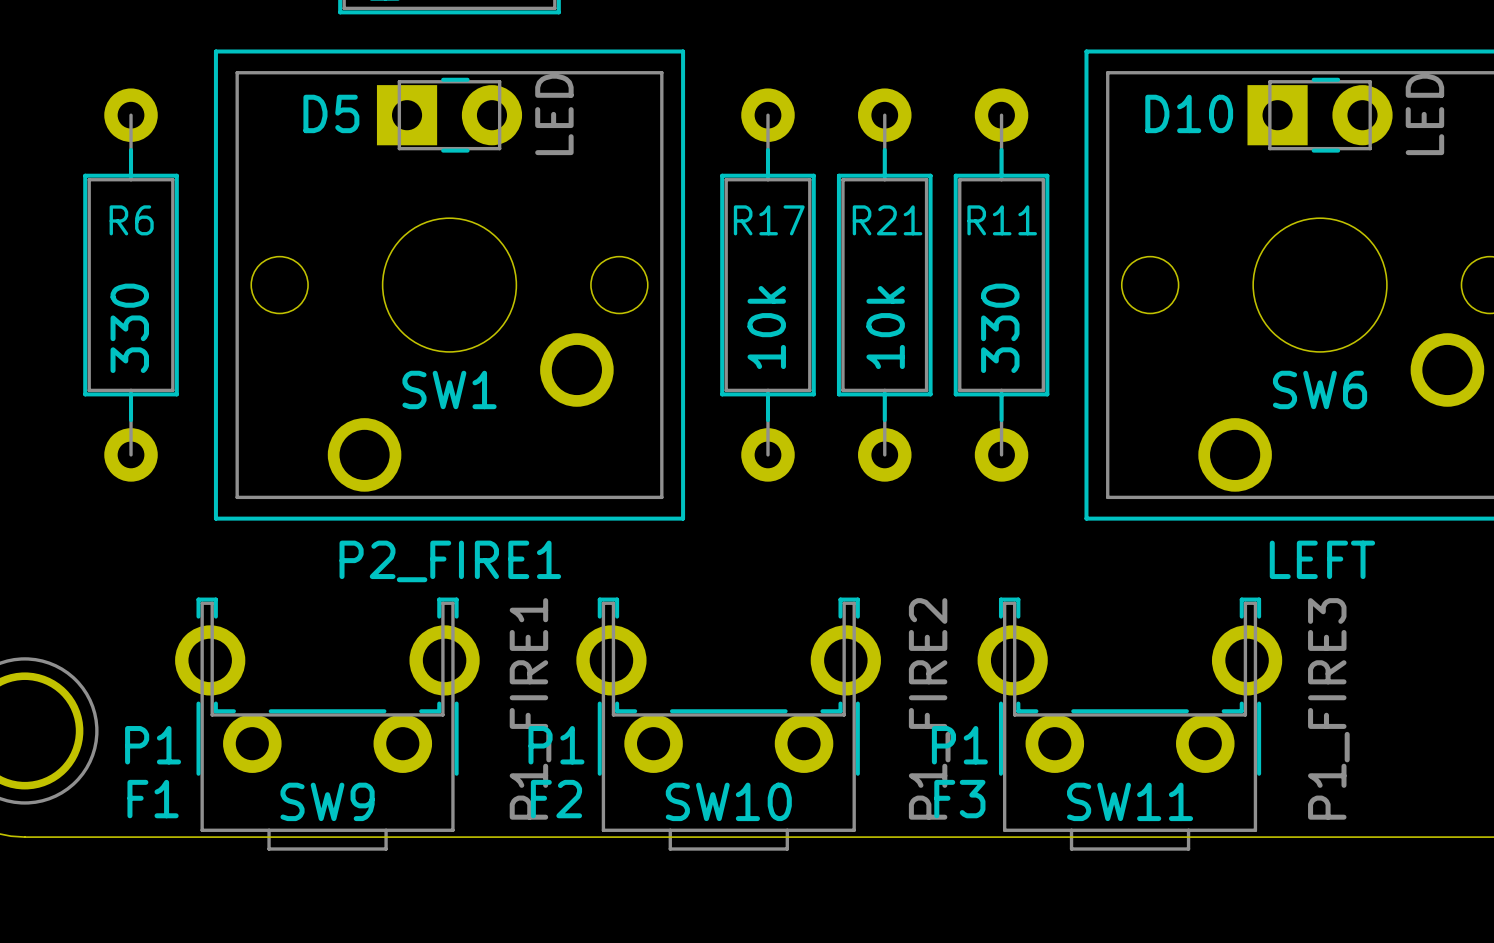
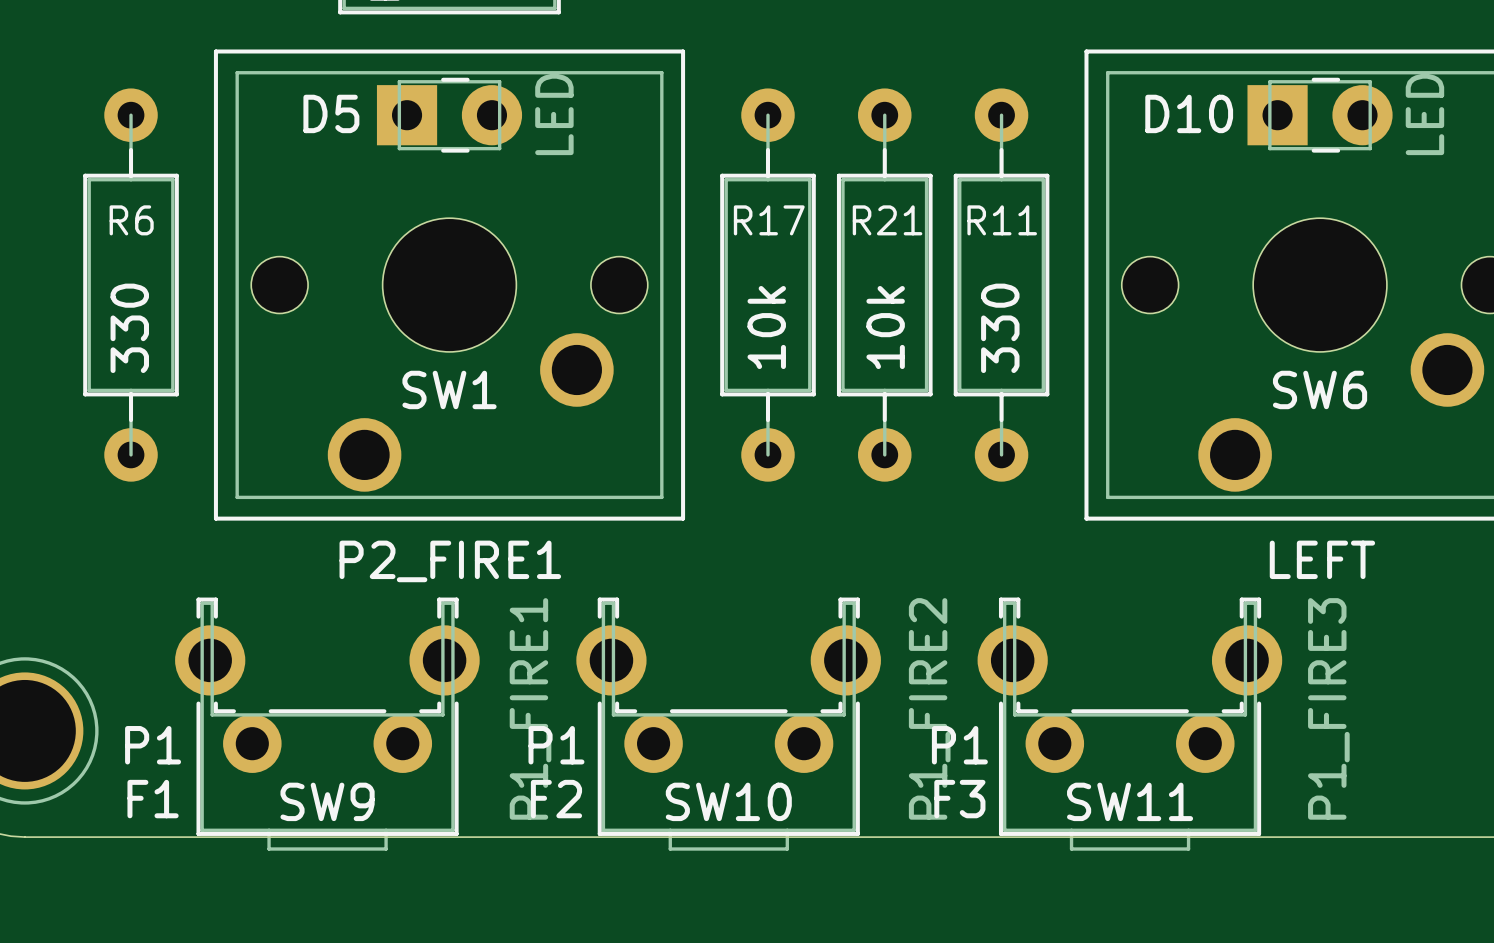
SW9 footprint: [175, 597, 480, 851] -> [175, 597, 480, 851]
SW10 footprint: [576, 597, 881, 851] -> [576, 597, 881, 851]
SW11 footprint: [977, 597, 1283, 851] -> [977, 597, 1283, 851]

